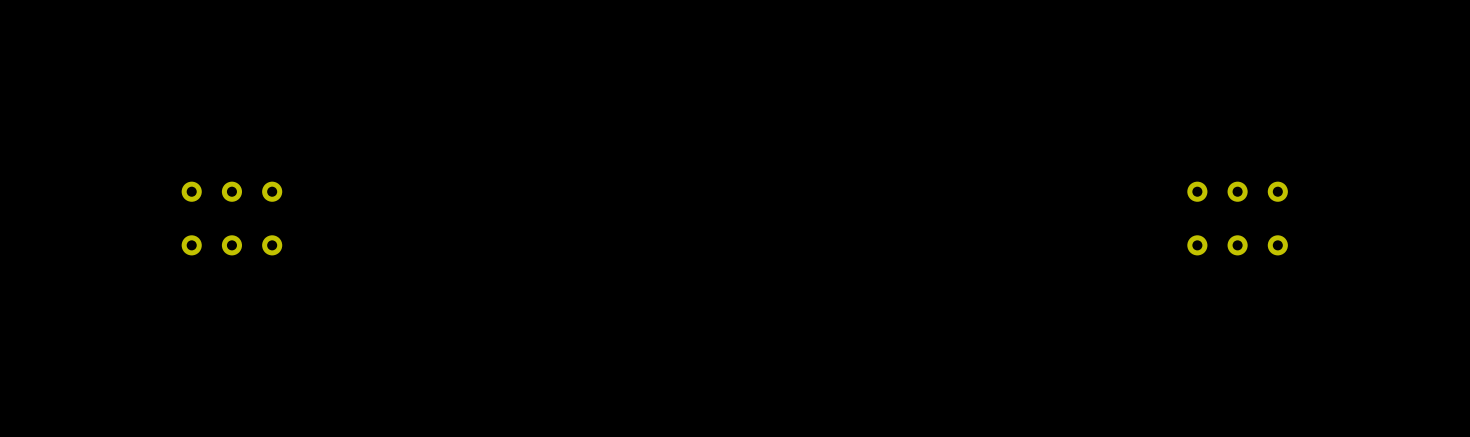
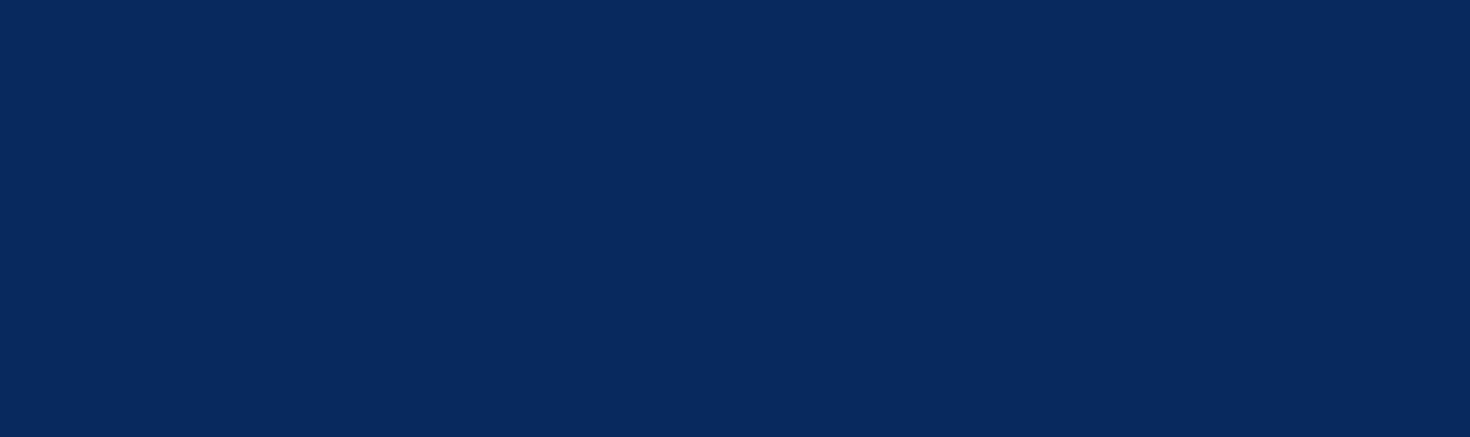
part: (231, 218) -> none
part: (1237, 218) -> none

